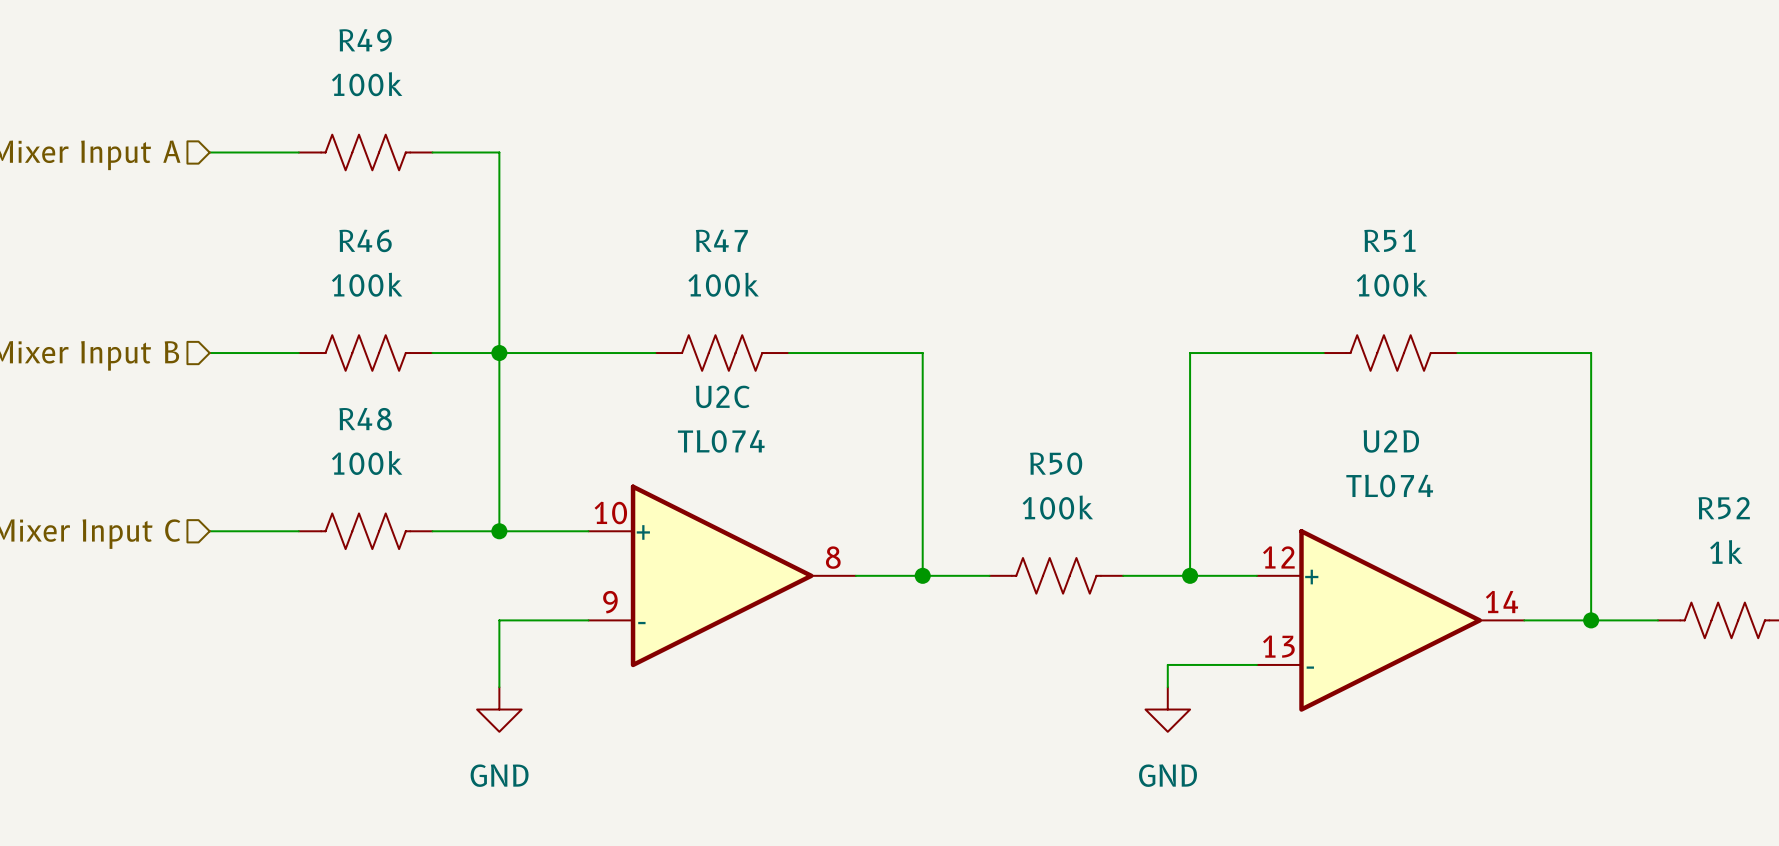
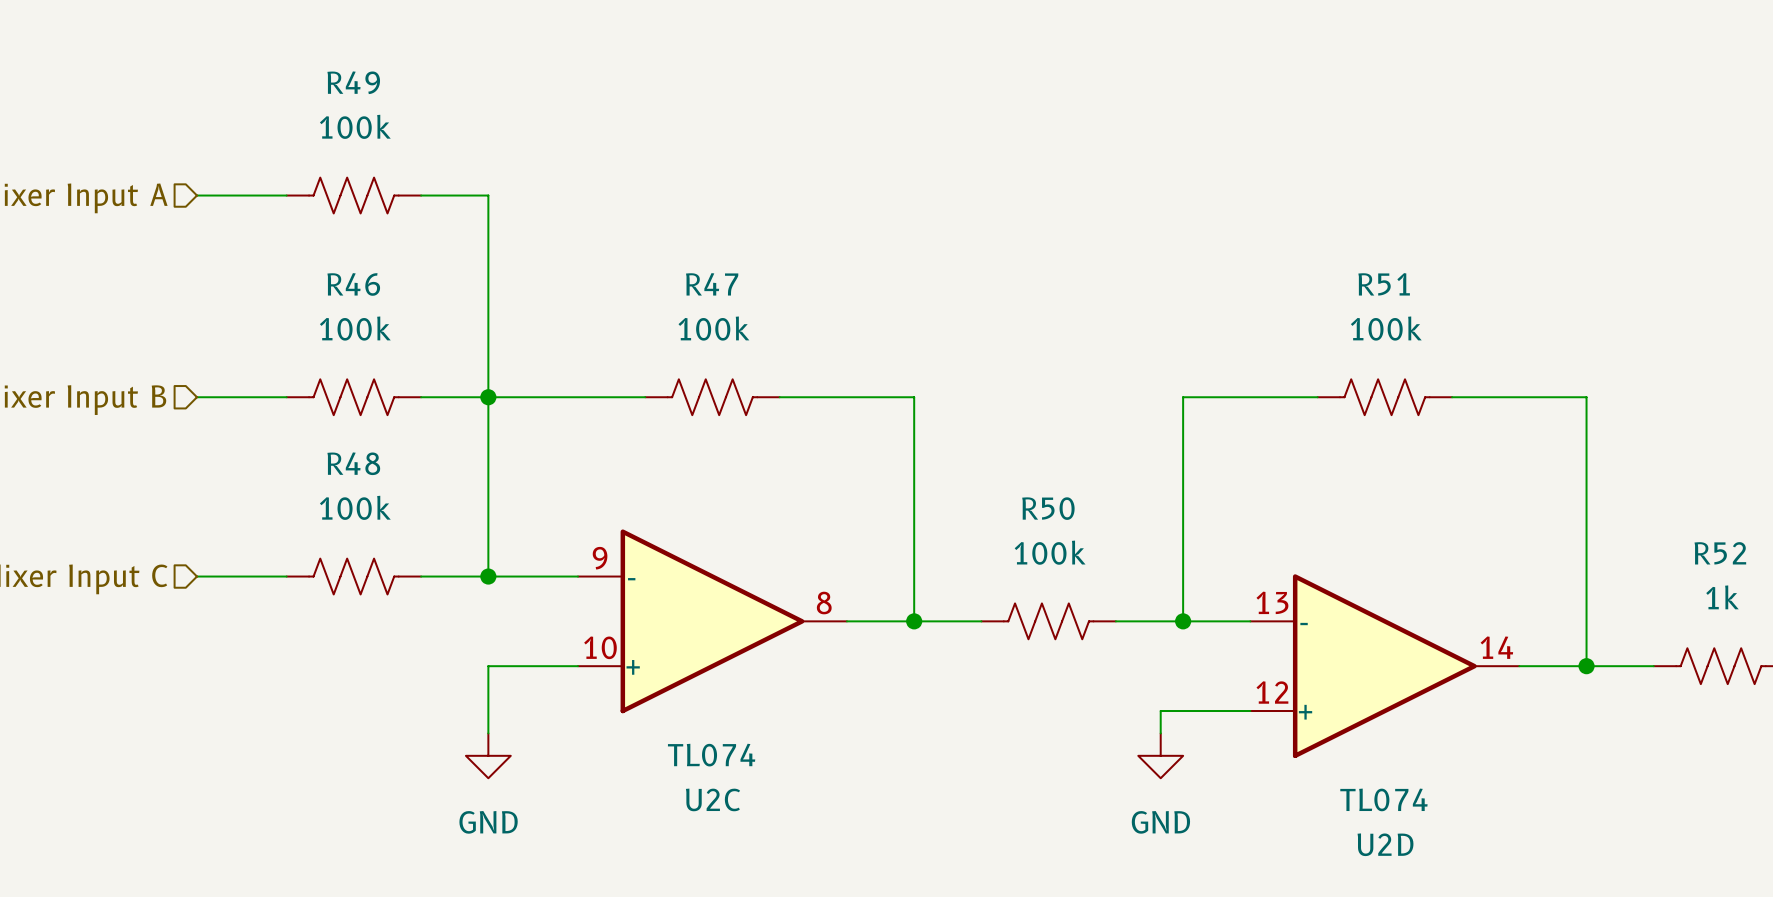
U2C flip: as is (722, 575) -> up-down (712, 621)
U2D flip: as is (1390, 620) -> up-down (1384, 666)

